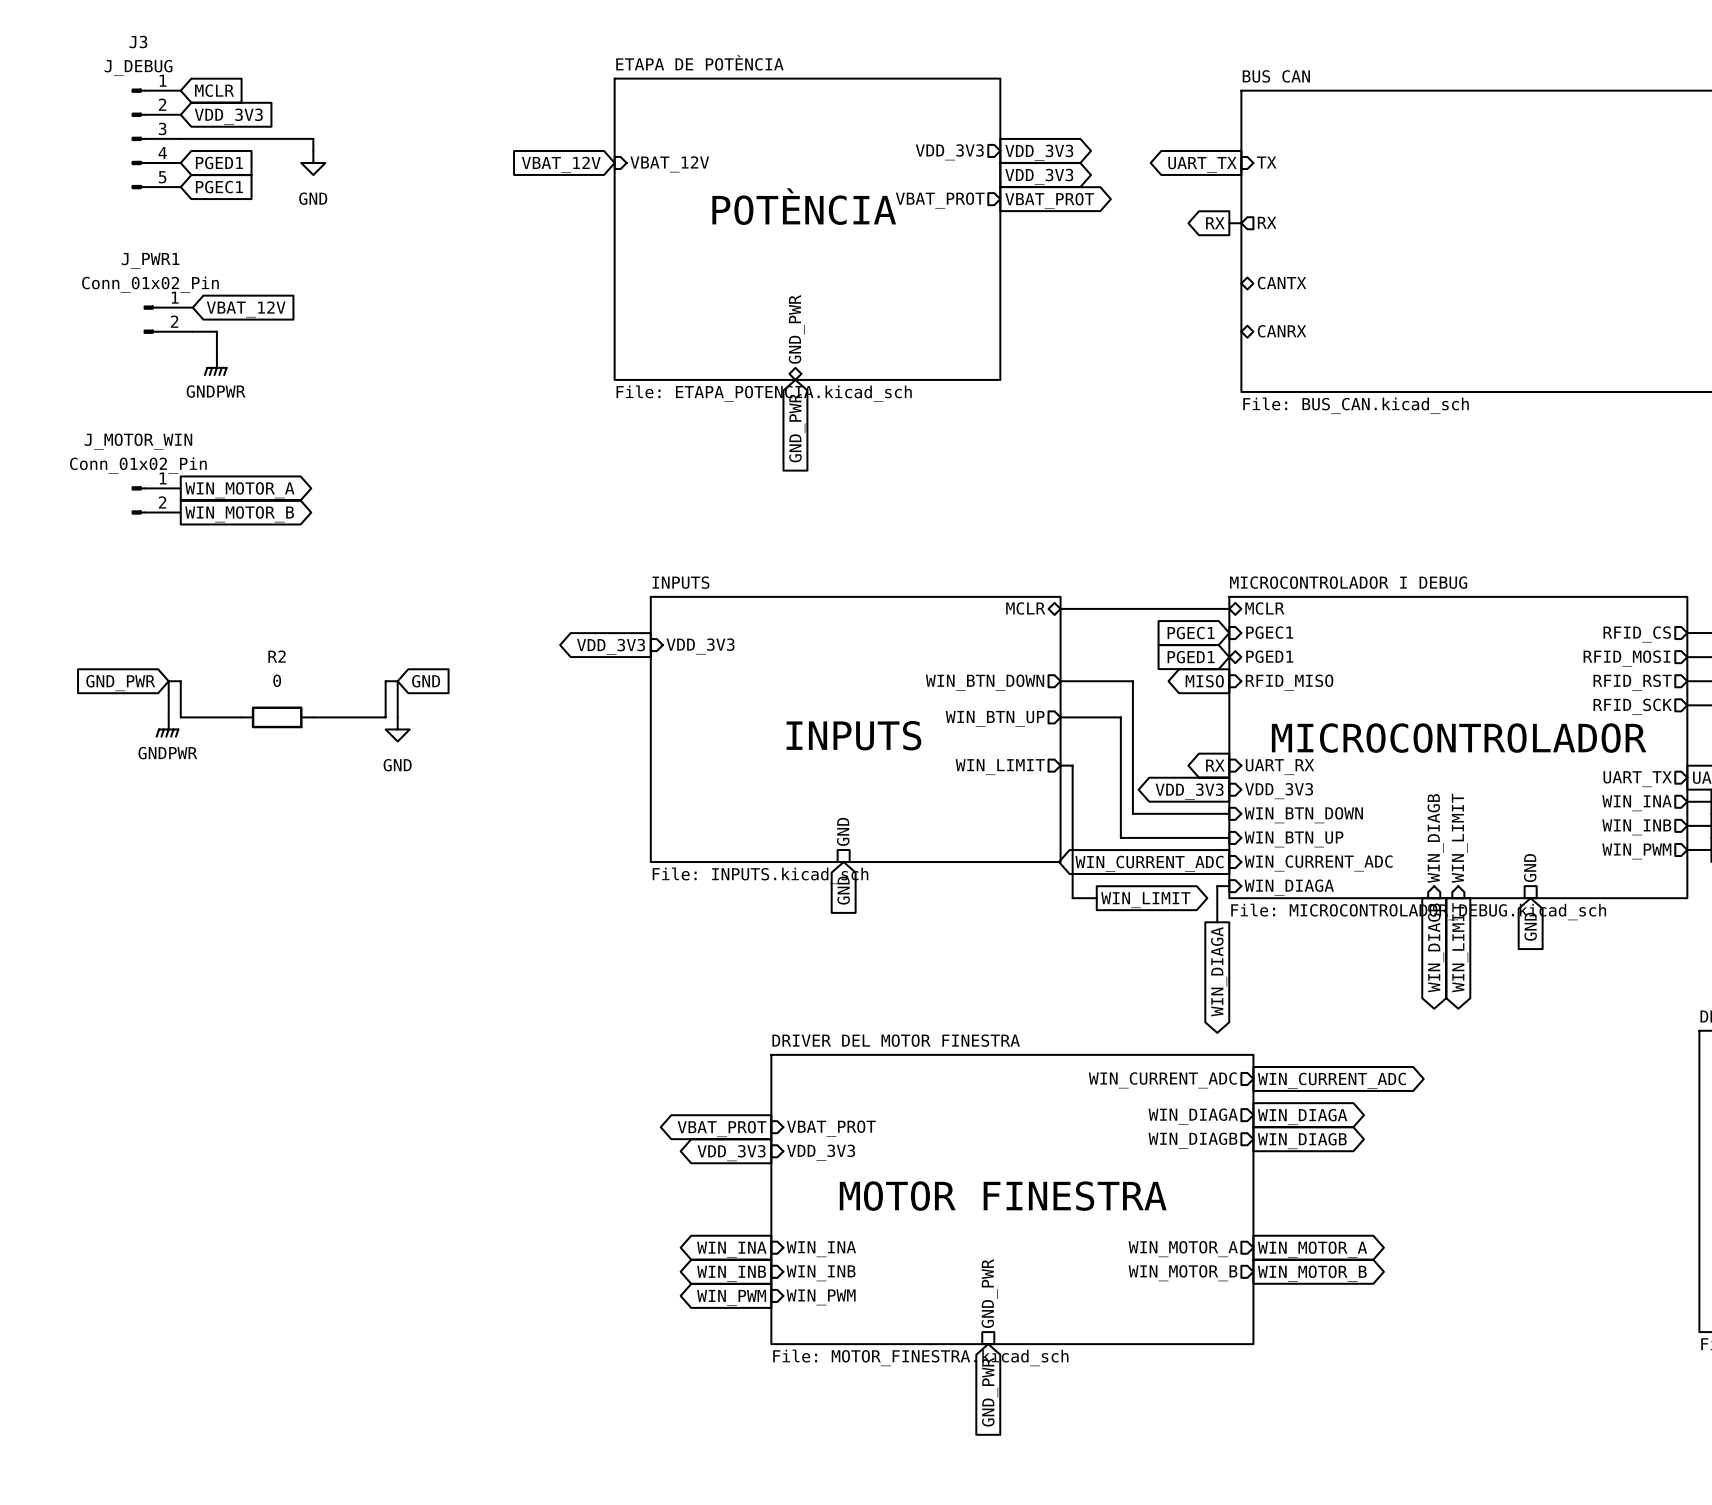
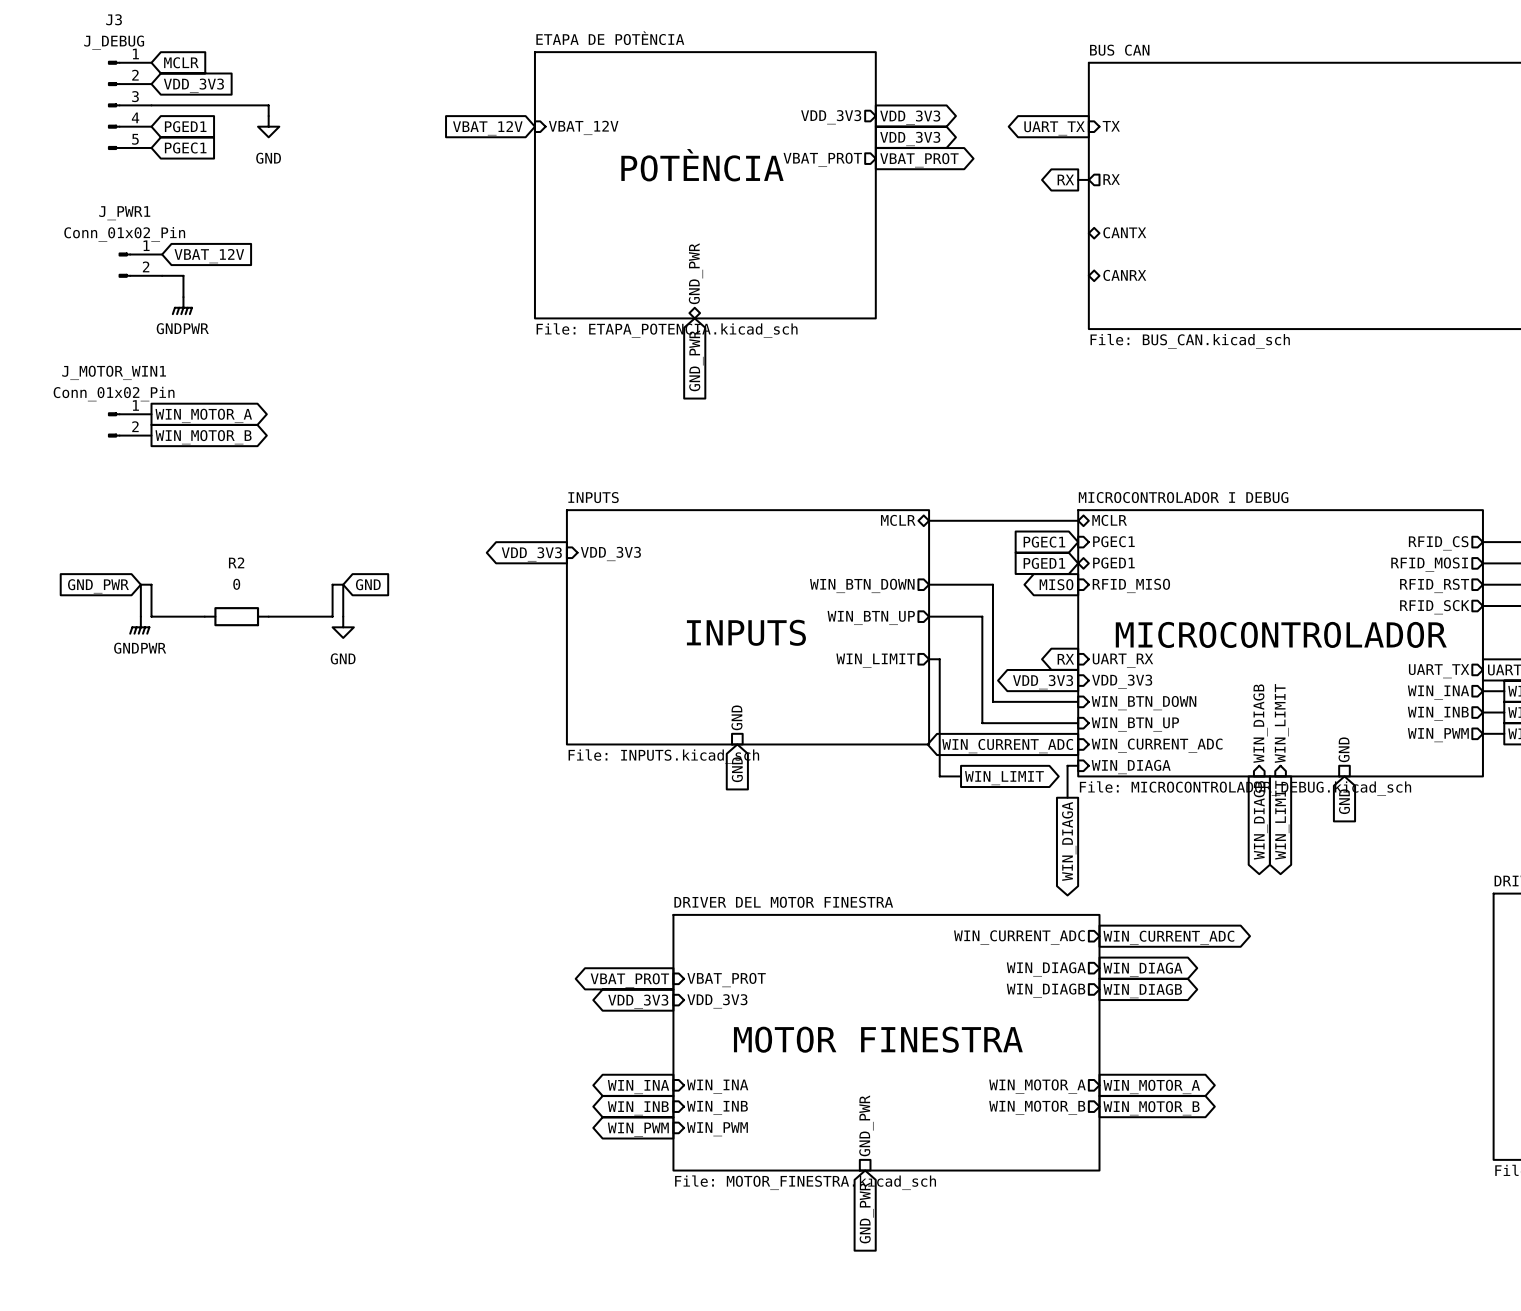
J_MOTOR_WIN name: J_MOTOR_WIN (138, 441) -> J_MOTOR_WIN1 (114, 372)

